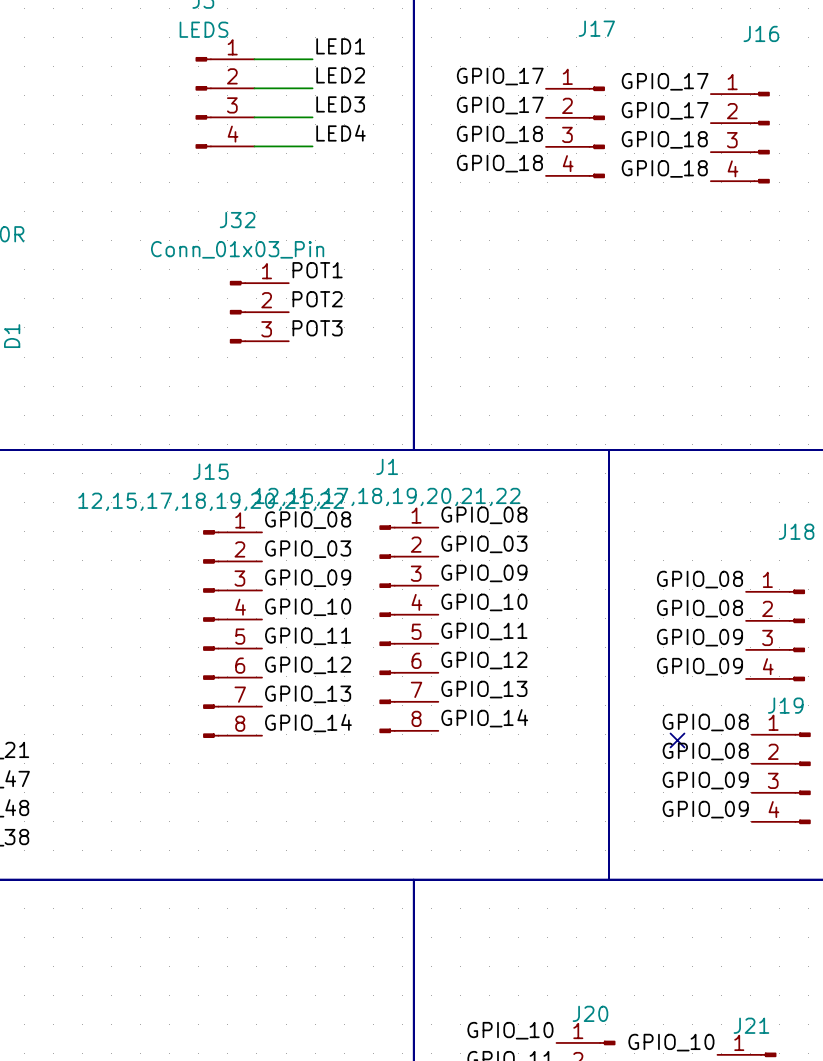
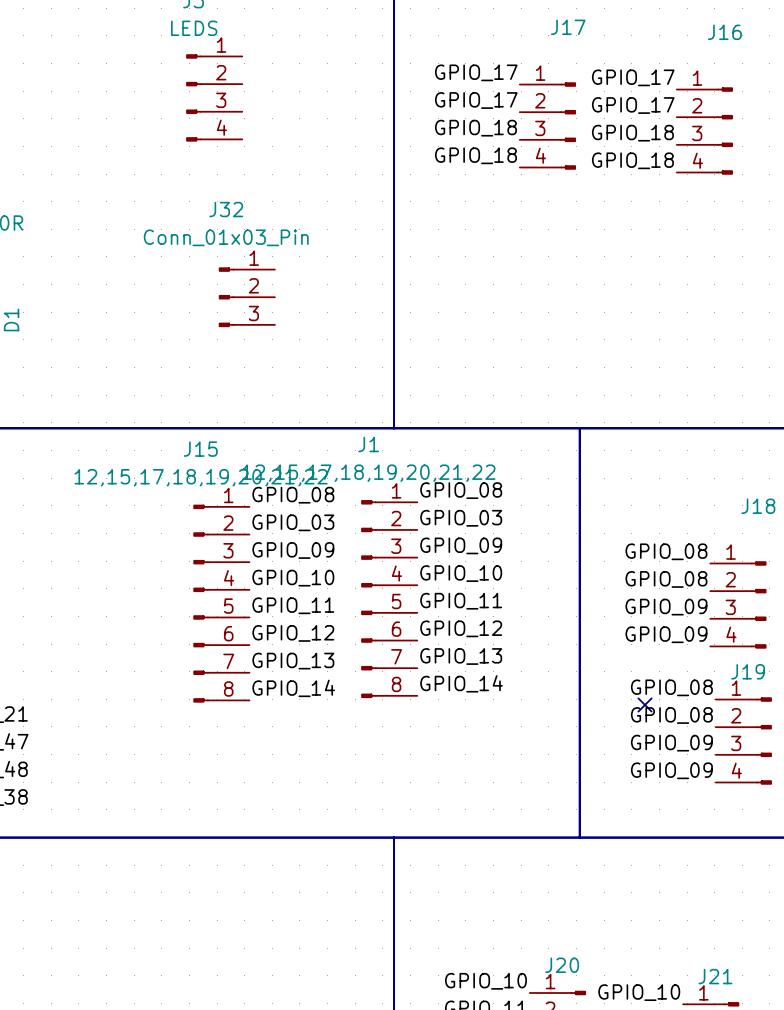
label: LED1 (340, 46) -> none
wire: (254, 59) (312, 59) -> none
label: LED2 (340, 75) -> none
wire: (254, 88) (312, 88) -> none
label: LED3 (340, 104) -> none
wire: (254, 117) (312, 117) -> none
label: LED4 (341, 133) -> none
wire: (254, 146) (312, 146) -> none
label: POT1 (317, 270) -> none
label: POT2 (317, 299) -> none
label: POT3 (317, 328) -> none

